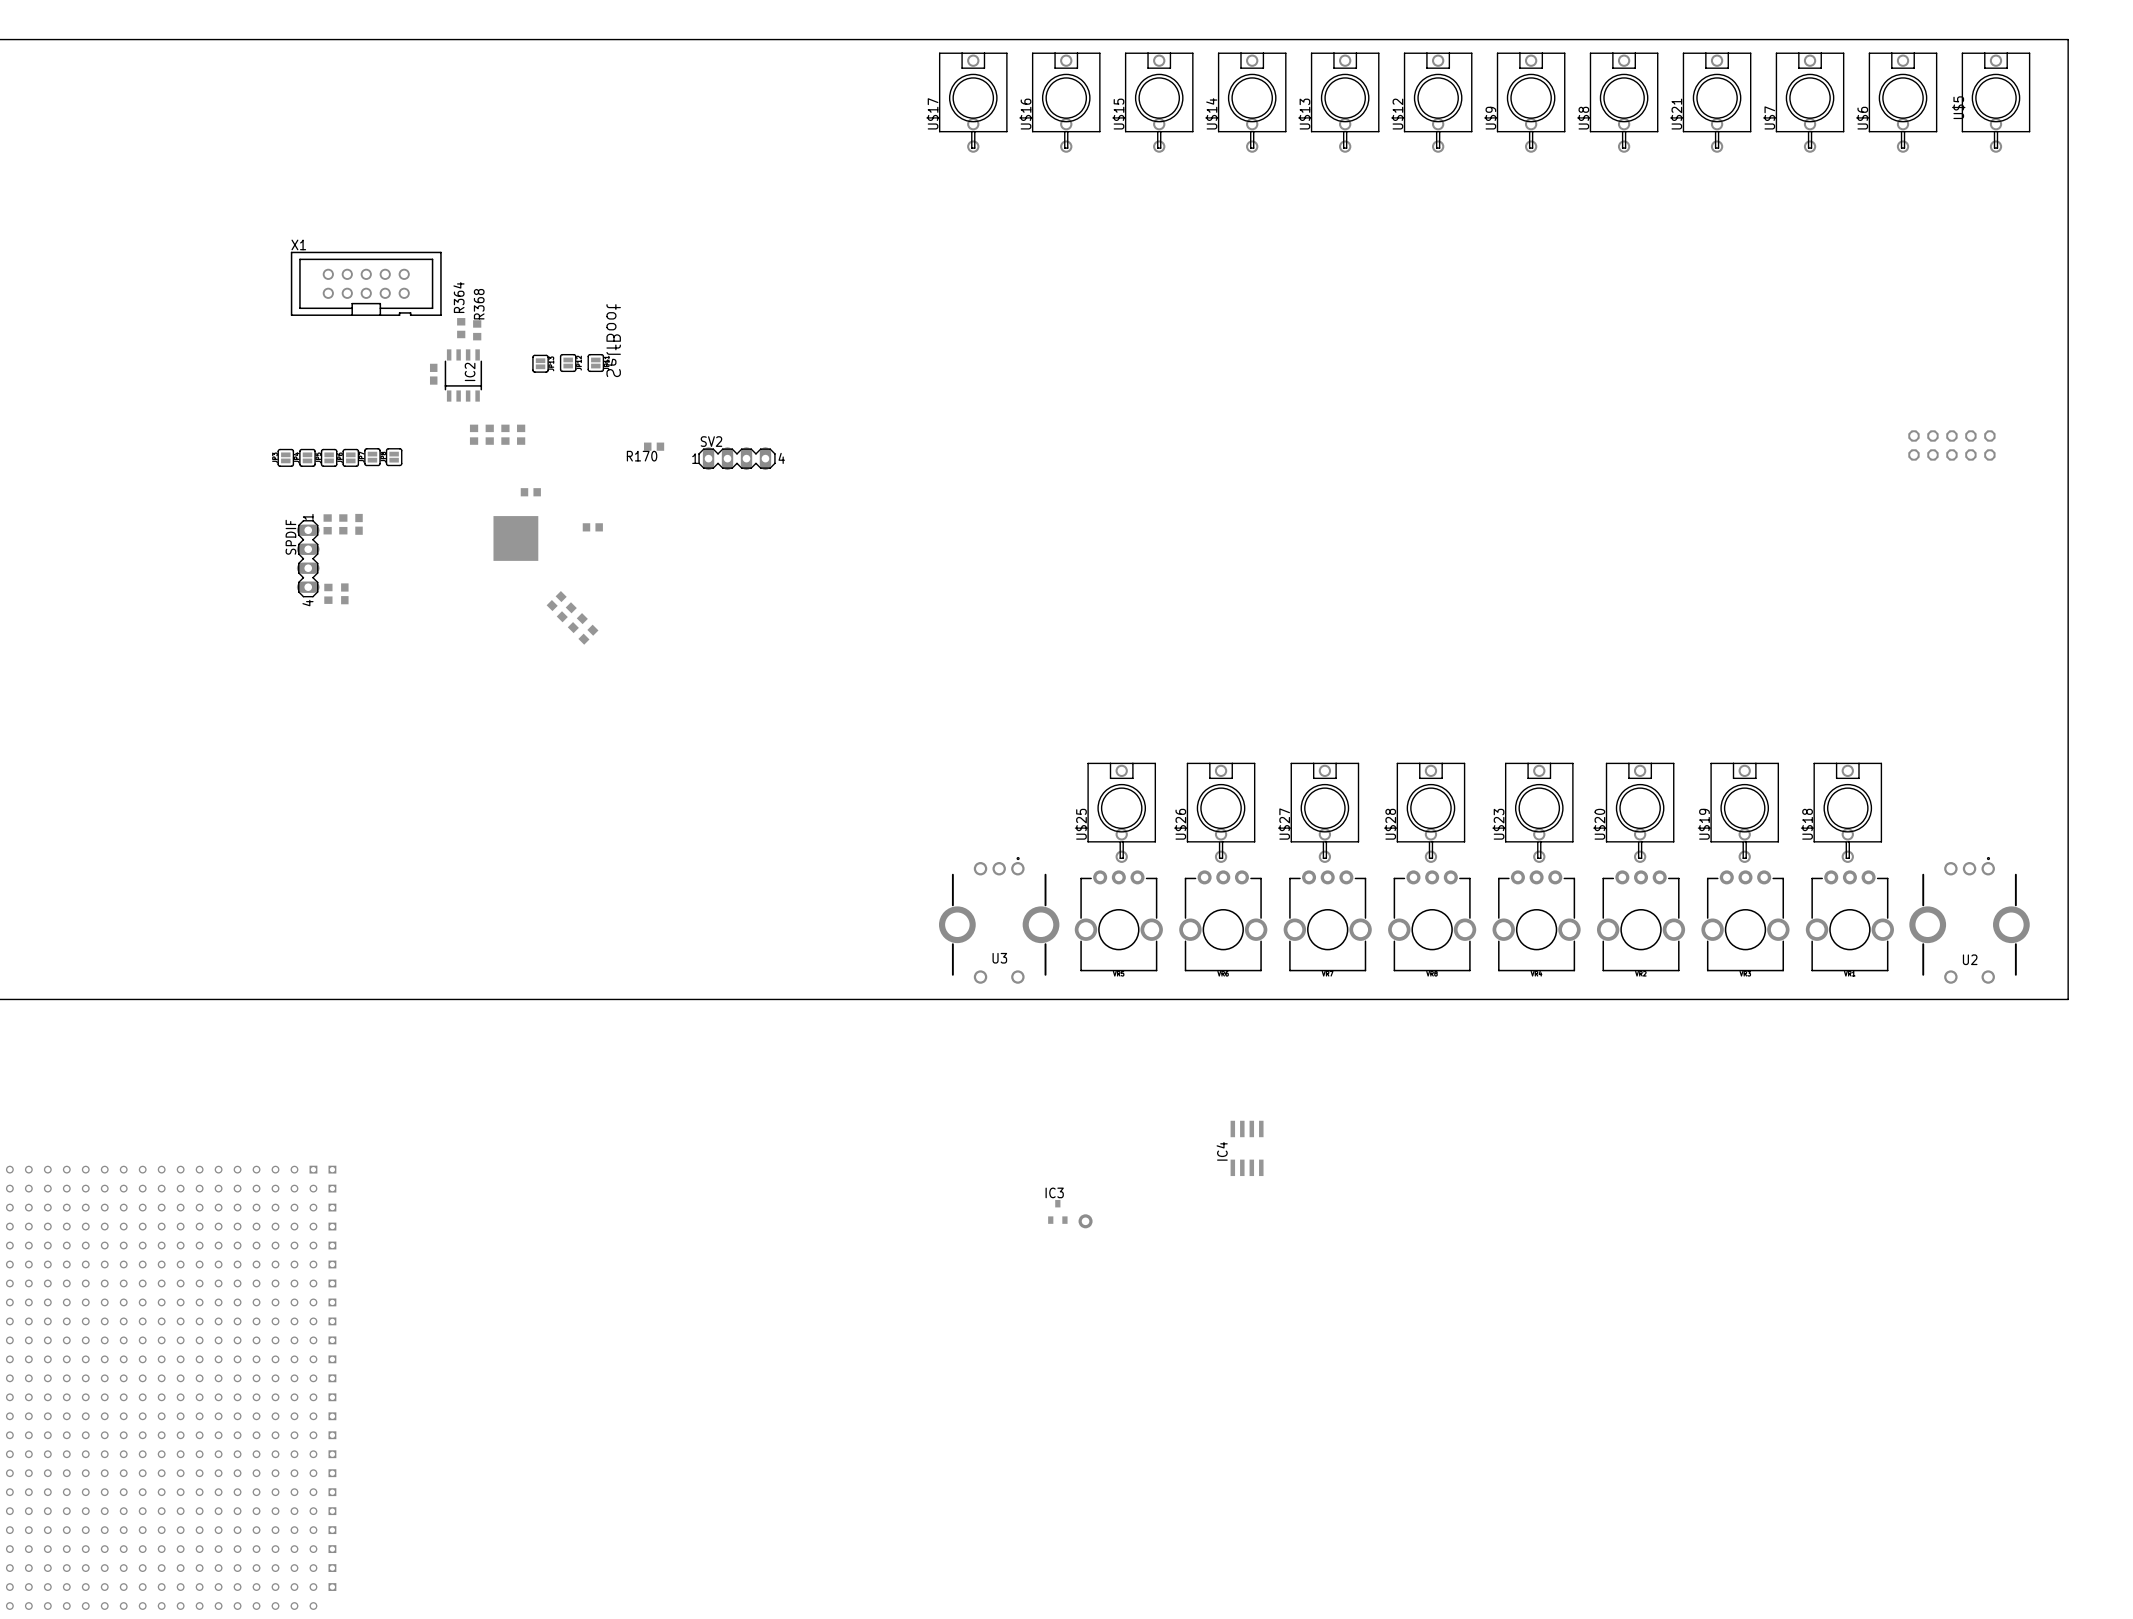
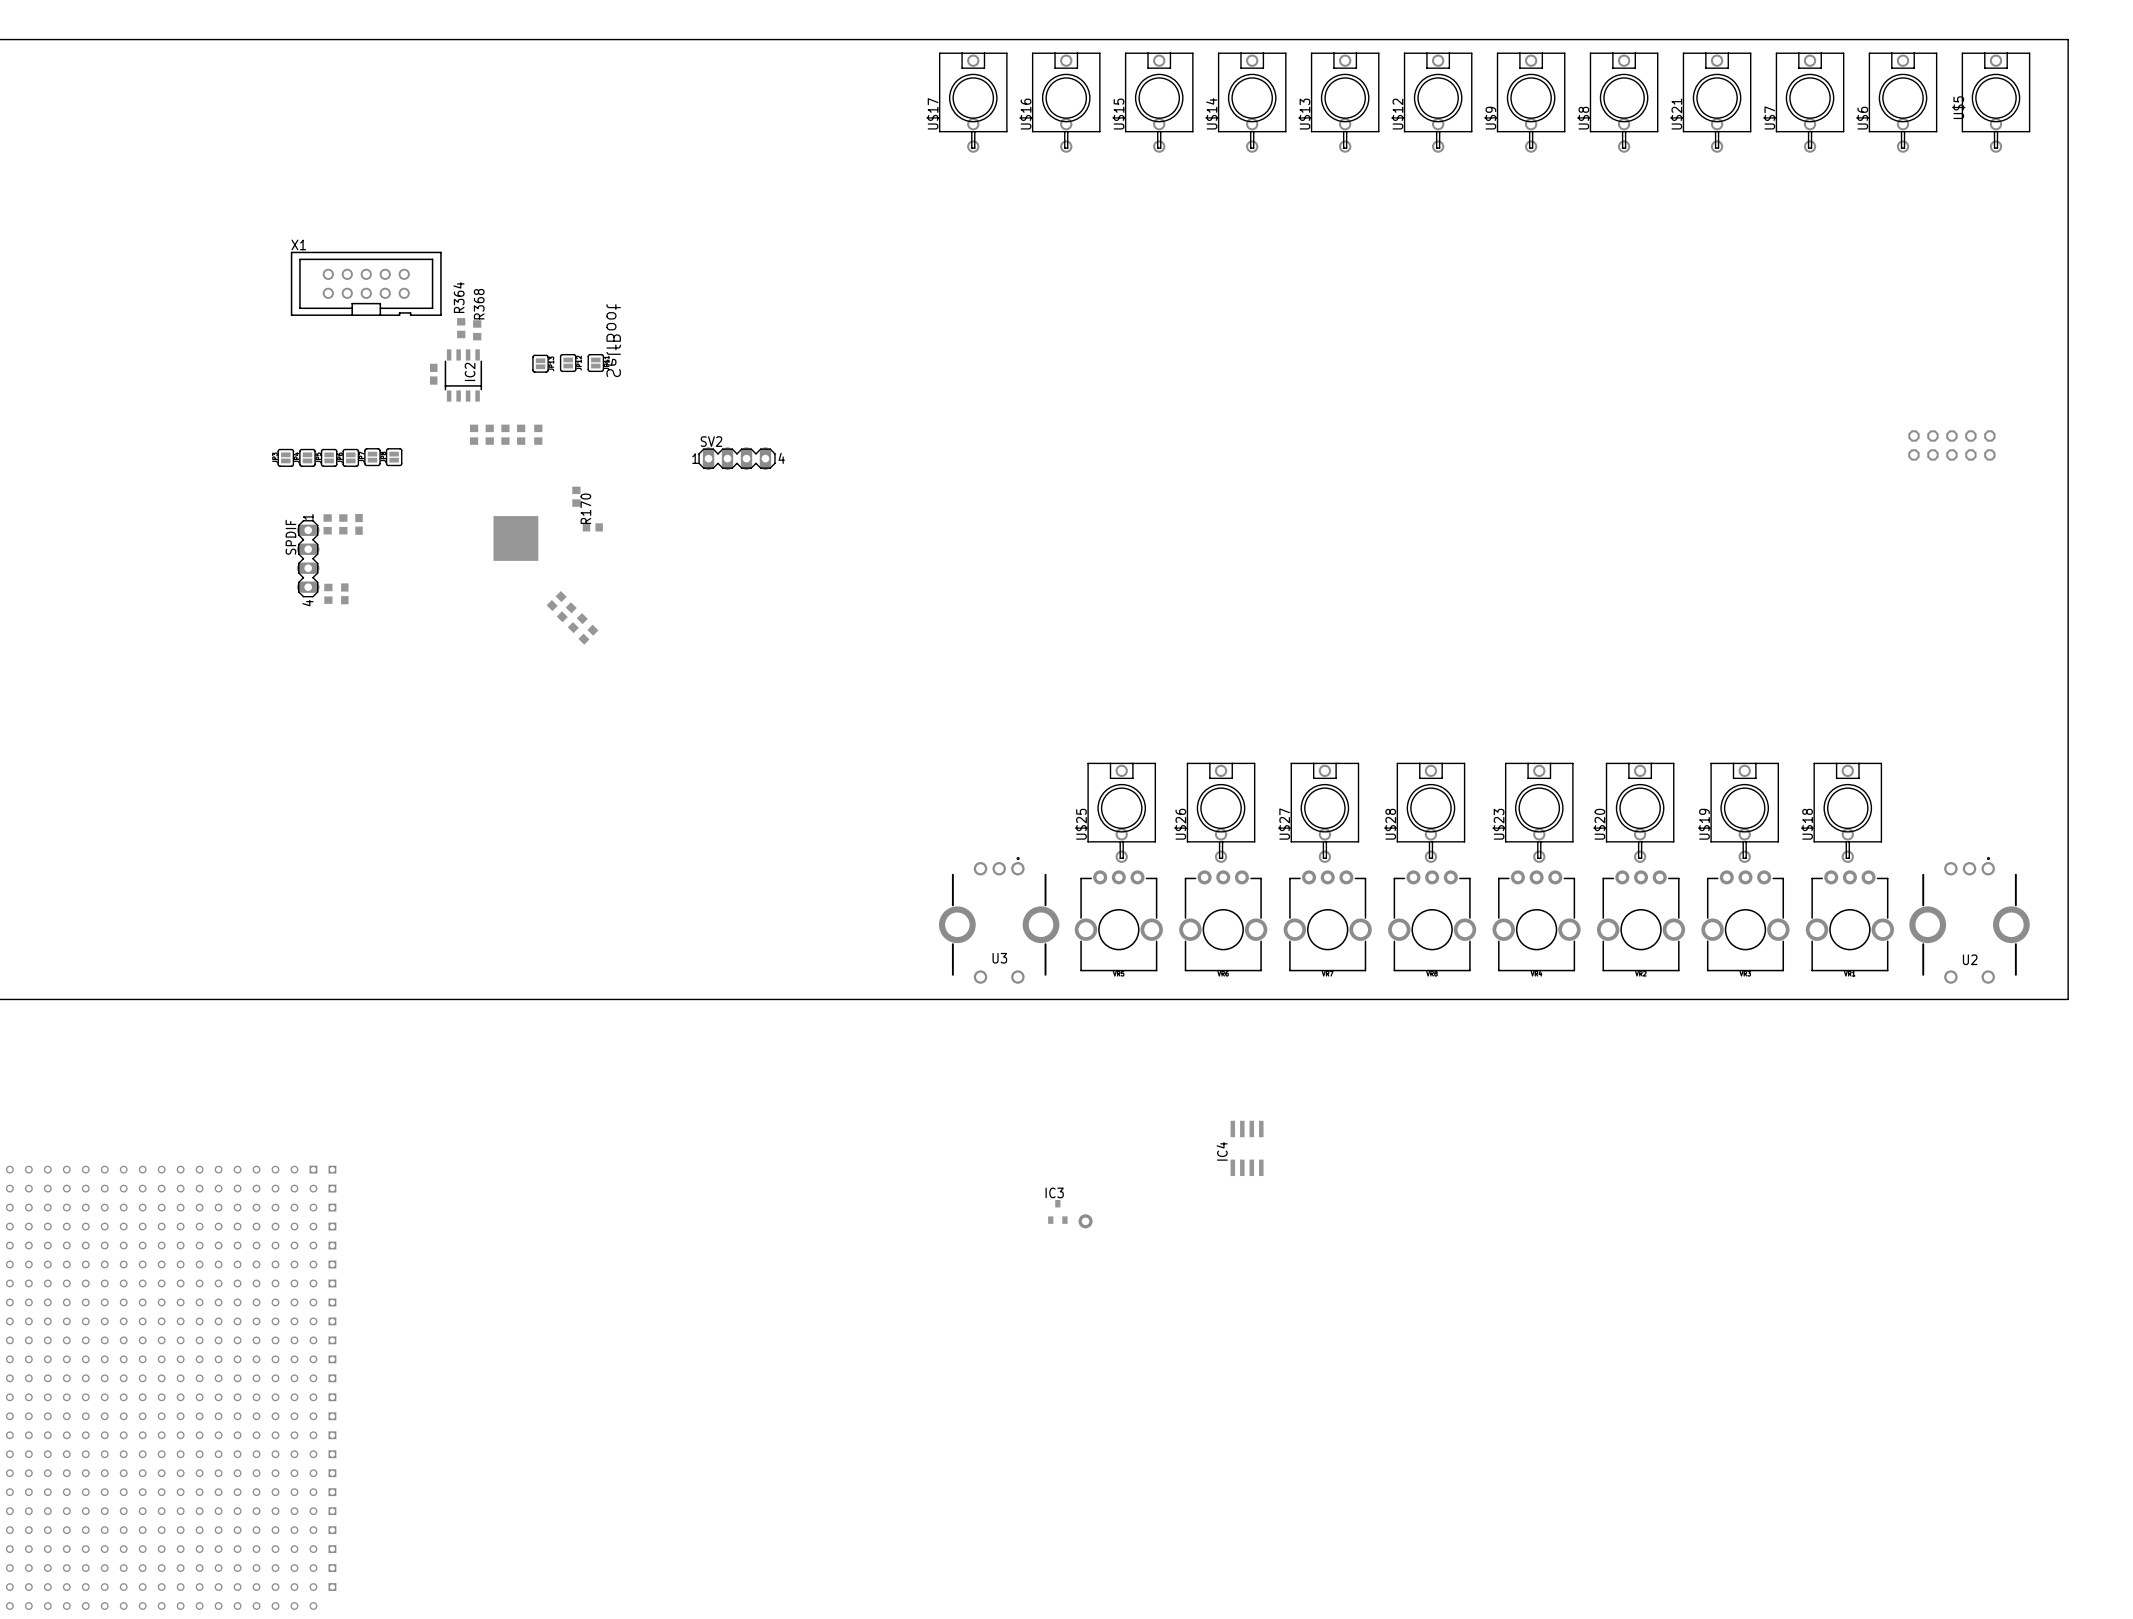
R170 rotation: 0° (654, 446) -> 90° clockwise (576, 496)
R170 position: (654, 446) -> (576, 496)
R170 name position: R170 (642, 456) -> R170 (585, 508)
part rotation: 0° (530, 492) -> 90° clockwise (538, 434)
part position: (530, 492) -> (538, 434)

